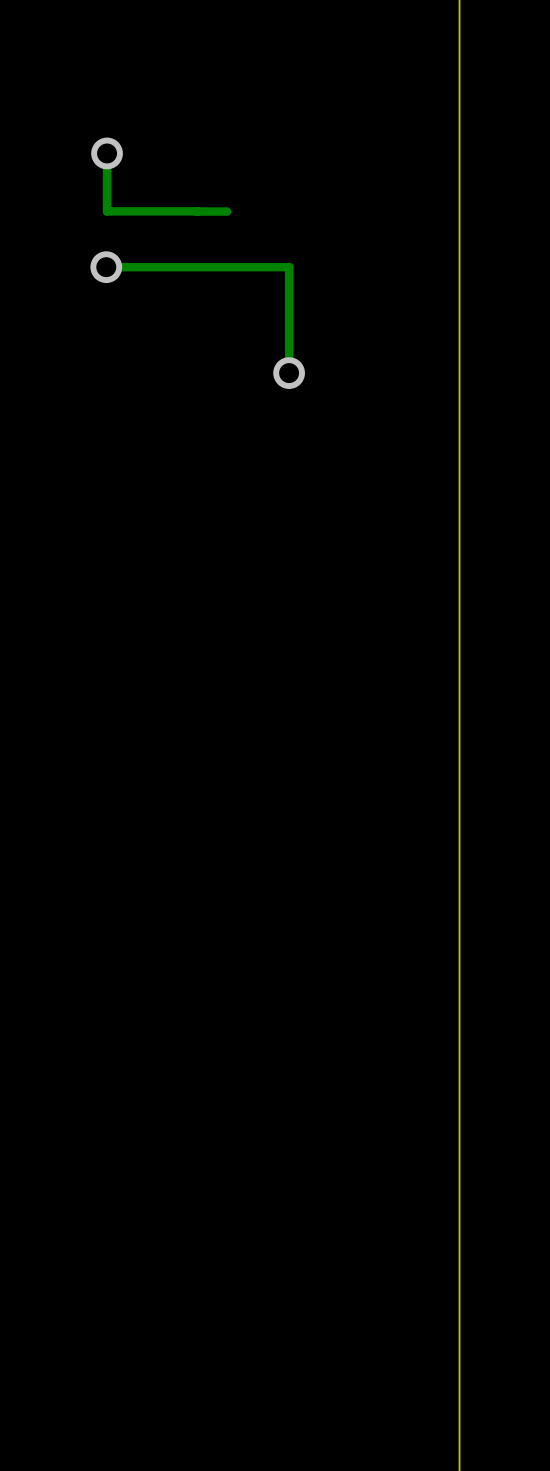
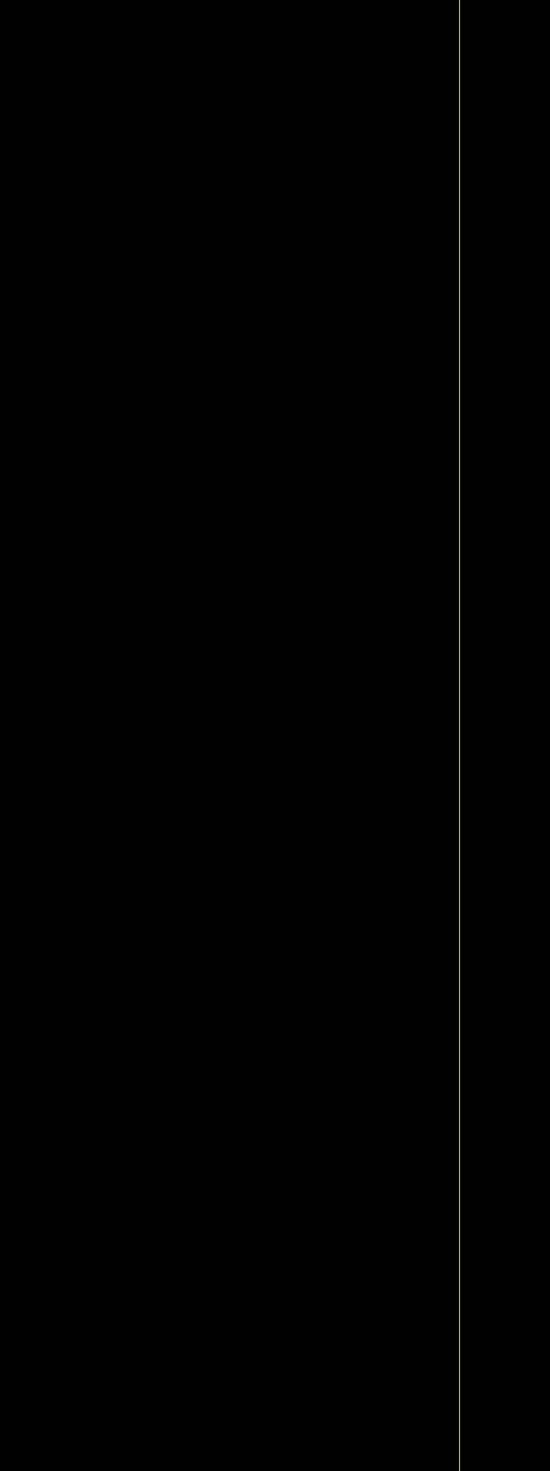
track: (107, 153) (107, 211) (197, 211) -> none
via: (107, 153) -> none
track: (227, 211) (197, 211) -> none
track: (106, 267) (289, 267) (289, 373) -> none
via: (106, 267) -> none
via: (289, 373) -> none

